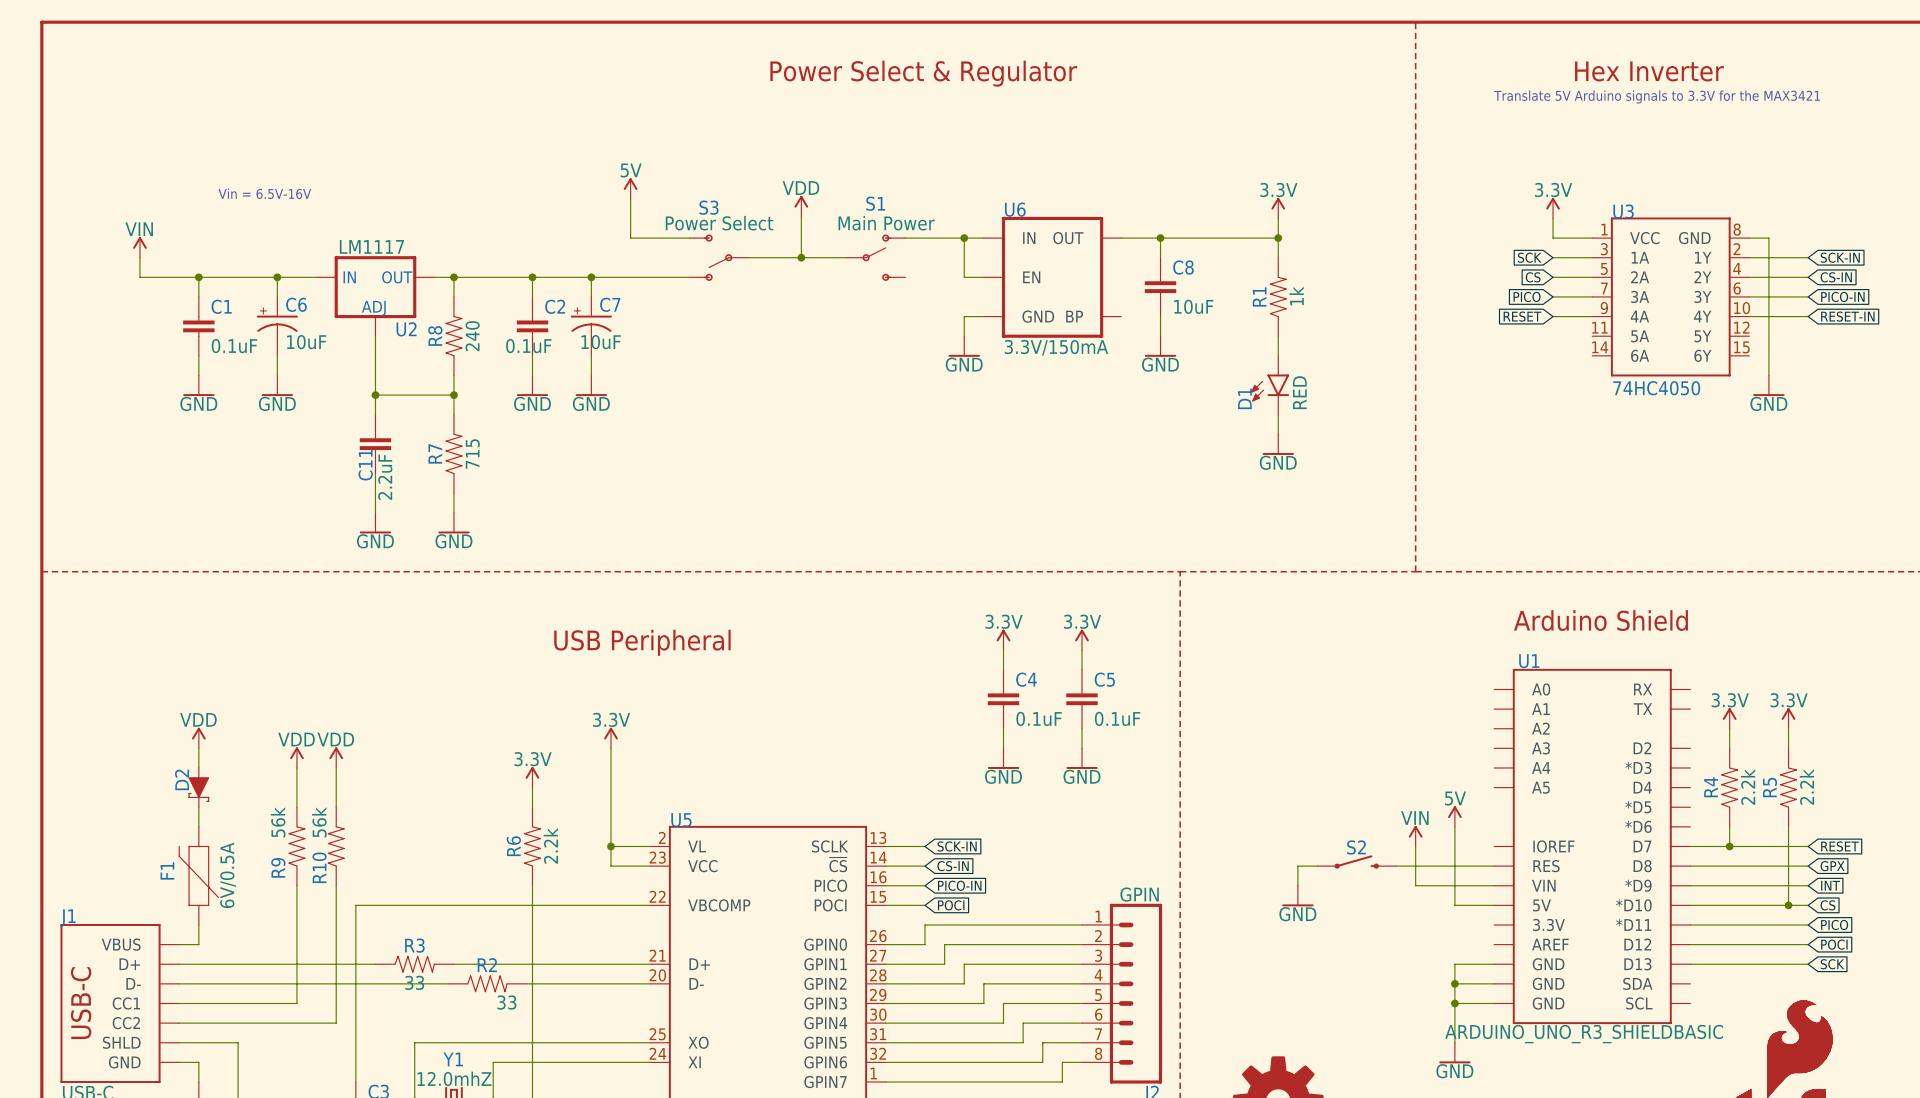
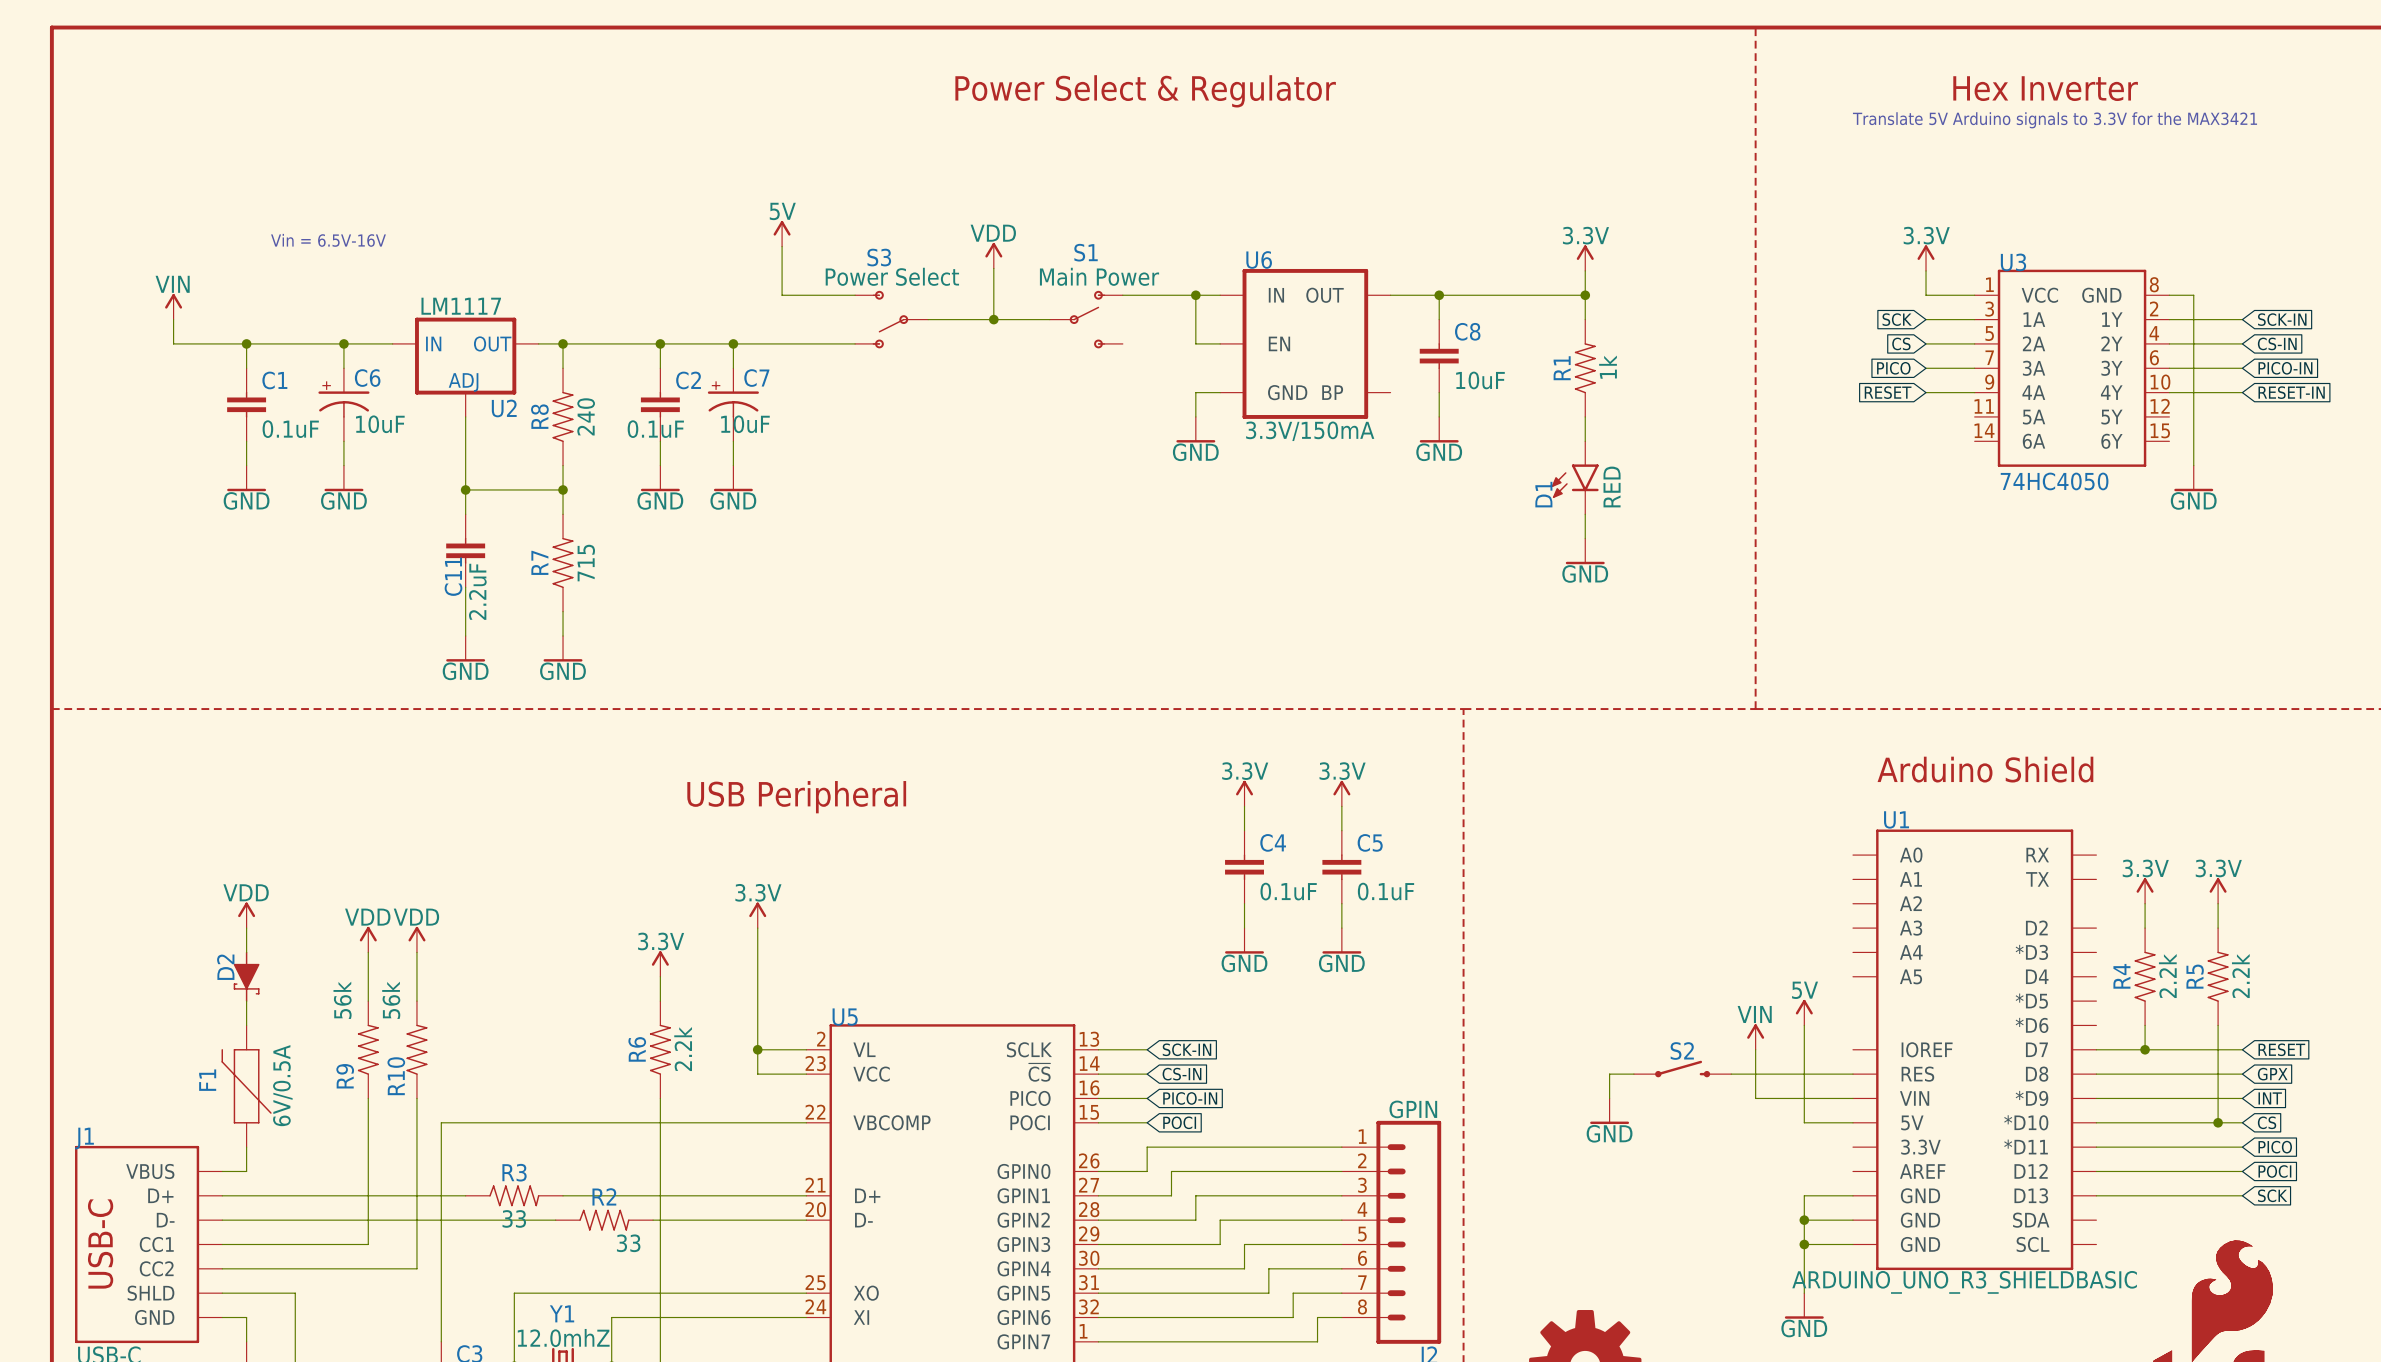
R9 value position: 56k (278, 822) -> 56k (342, 1000)
R10 value position: 56k (319, 822) -> 56k (391, 1000)

